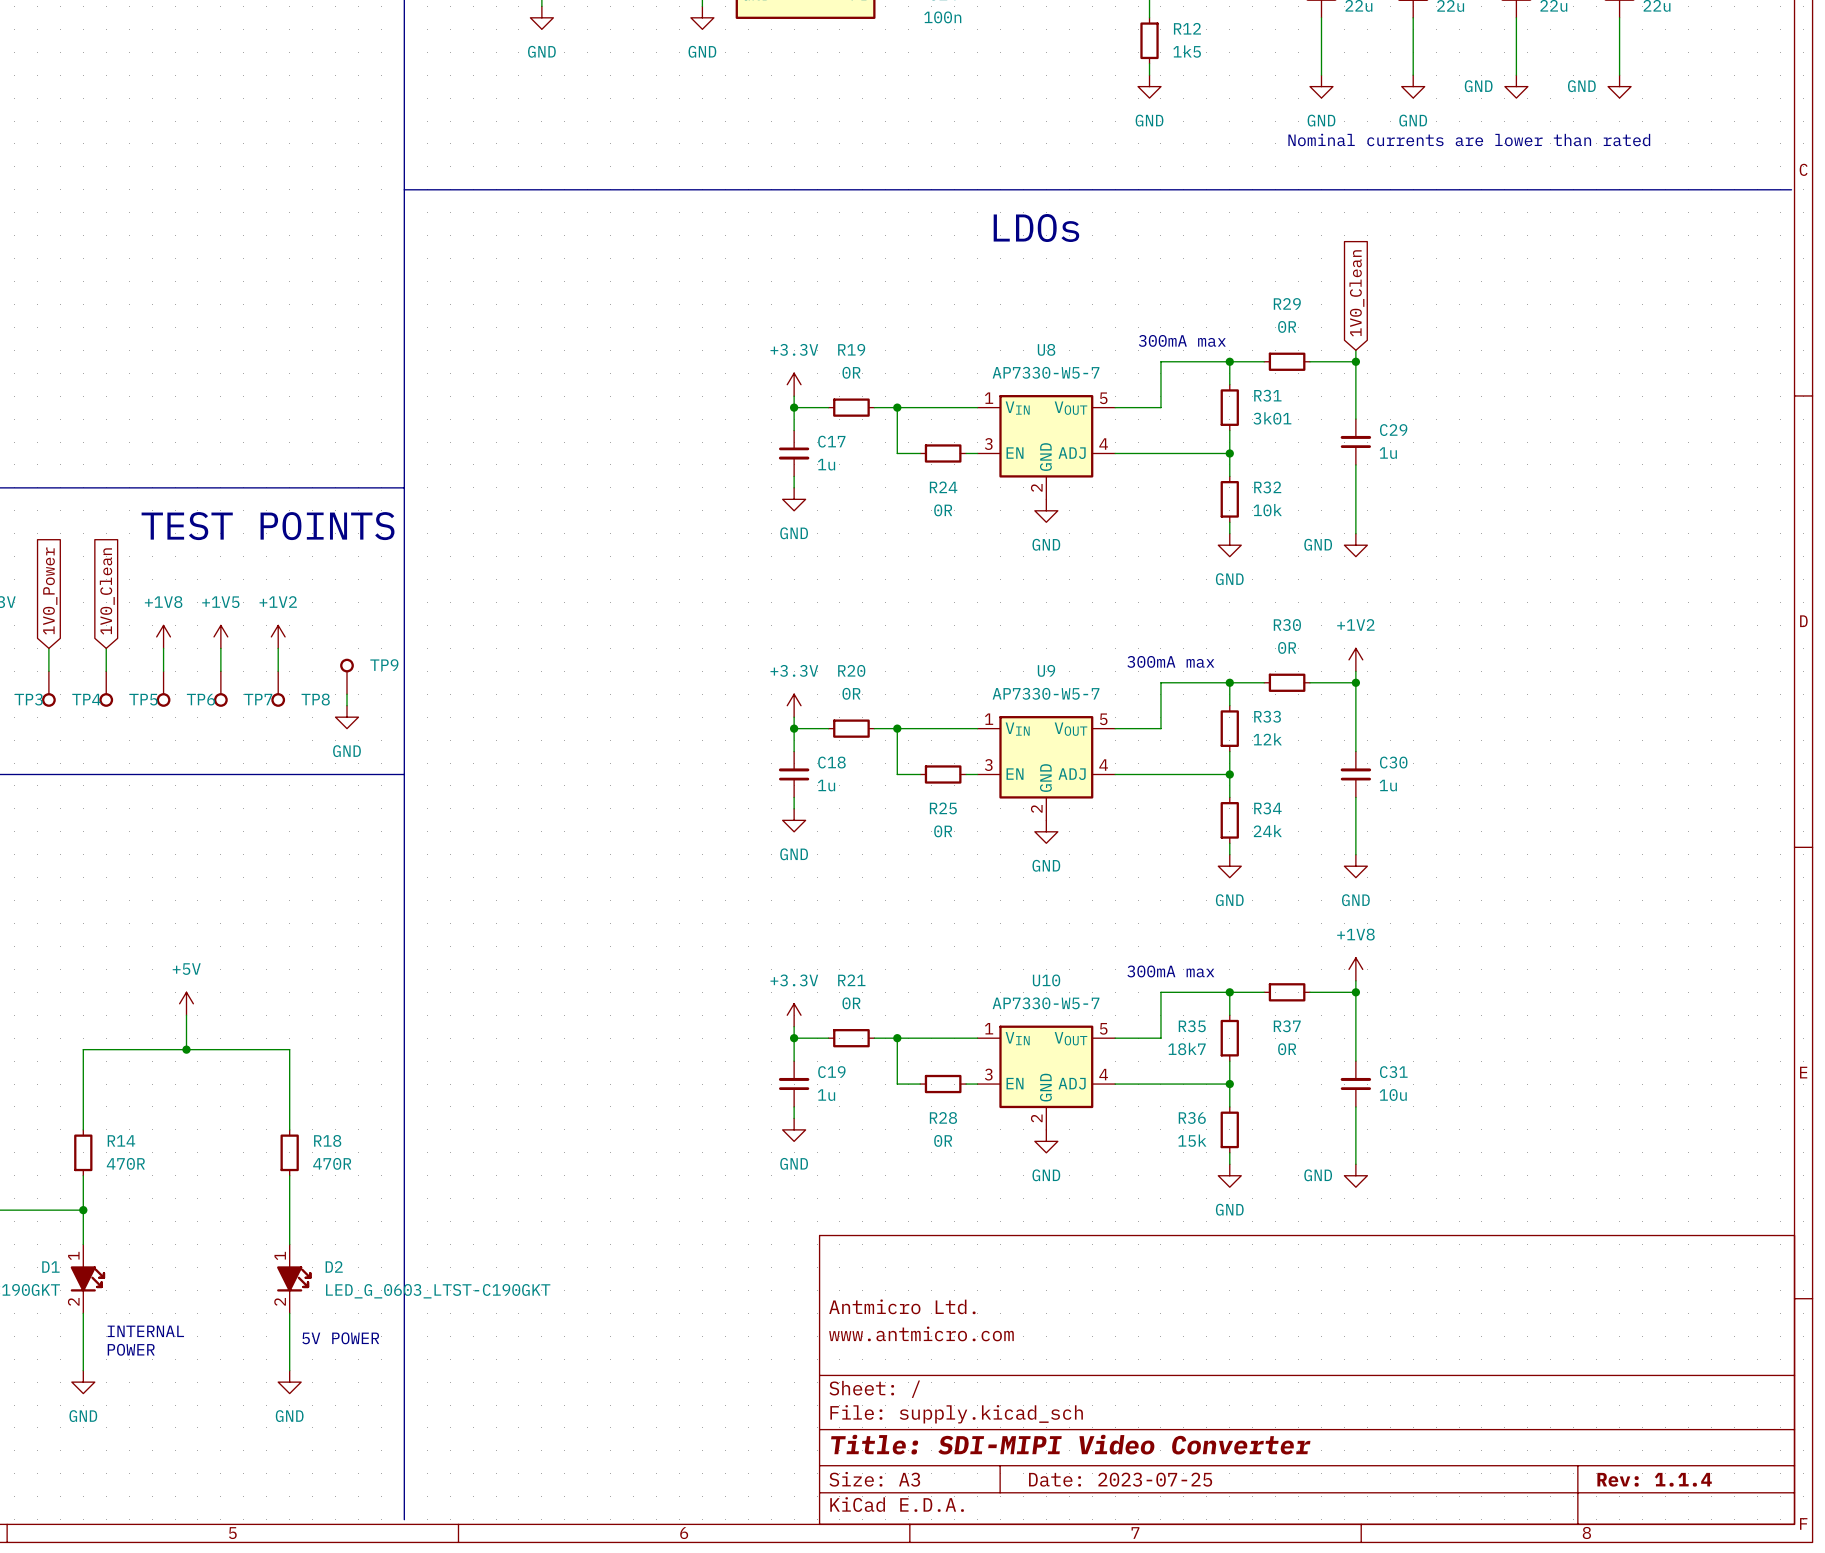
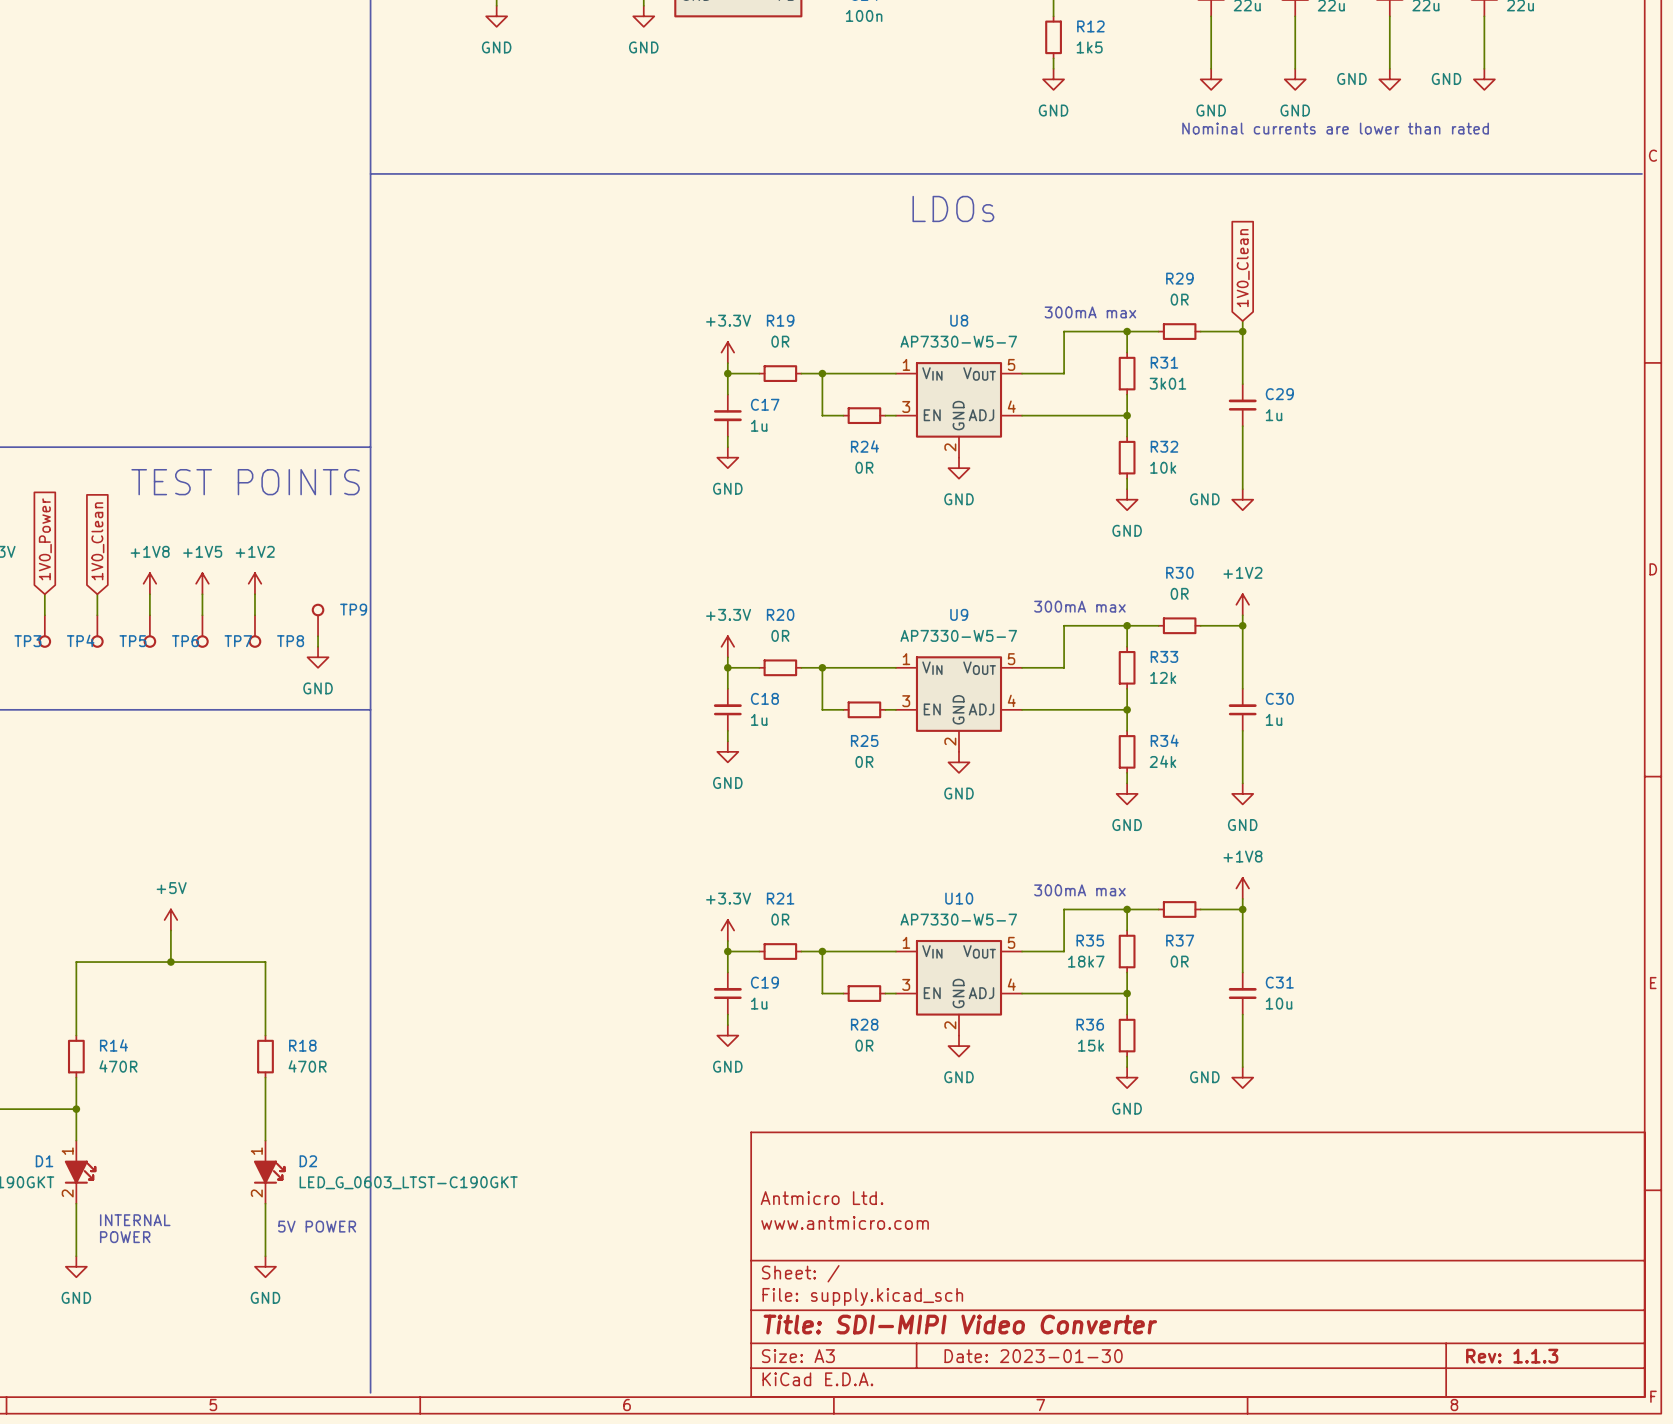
title block: Date: 2023-07-25 (1120, 1479) -> Date: 2023-01-30 (1033, 1356)
title block: Rev: 1.1.4 (1654, 1479) -> Rev: 1.1.3 (1512, 1356)

